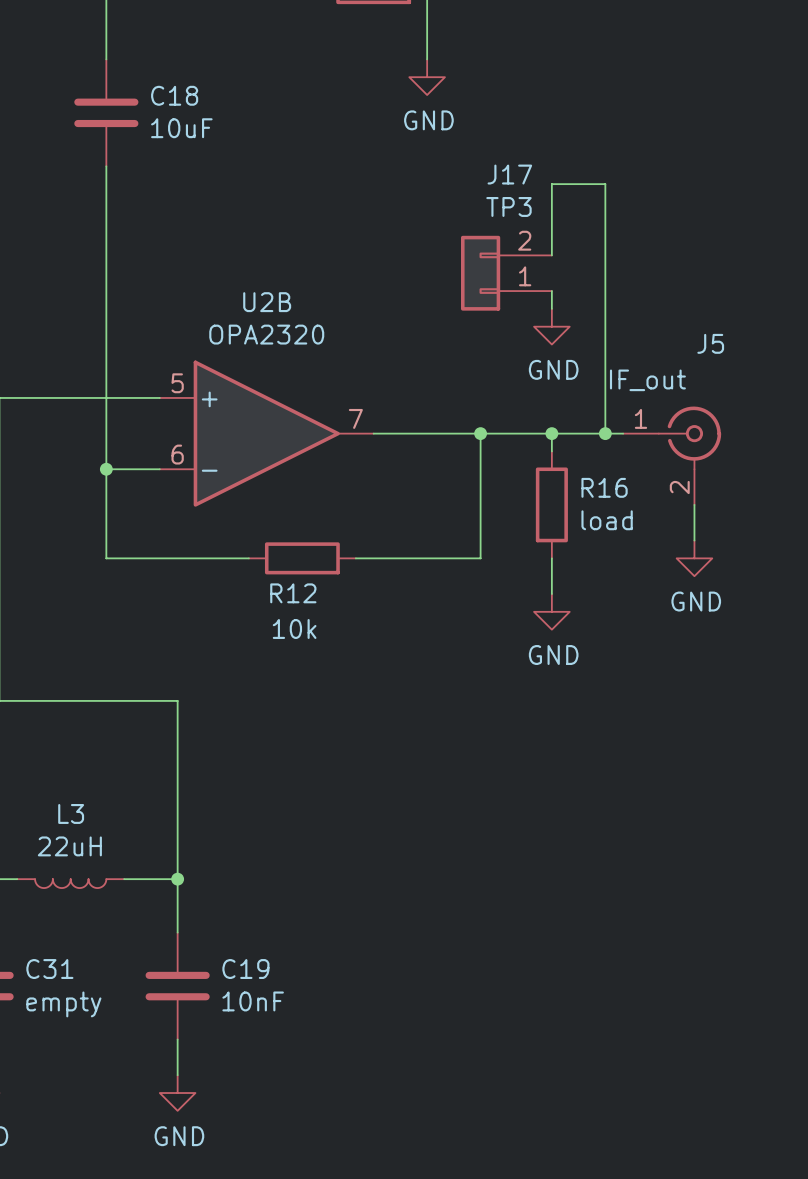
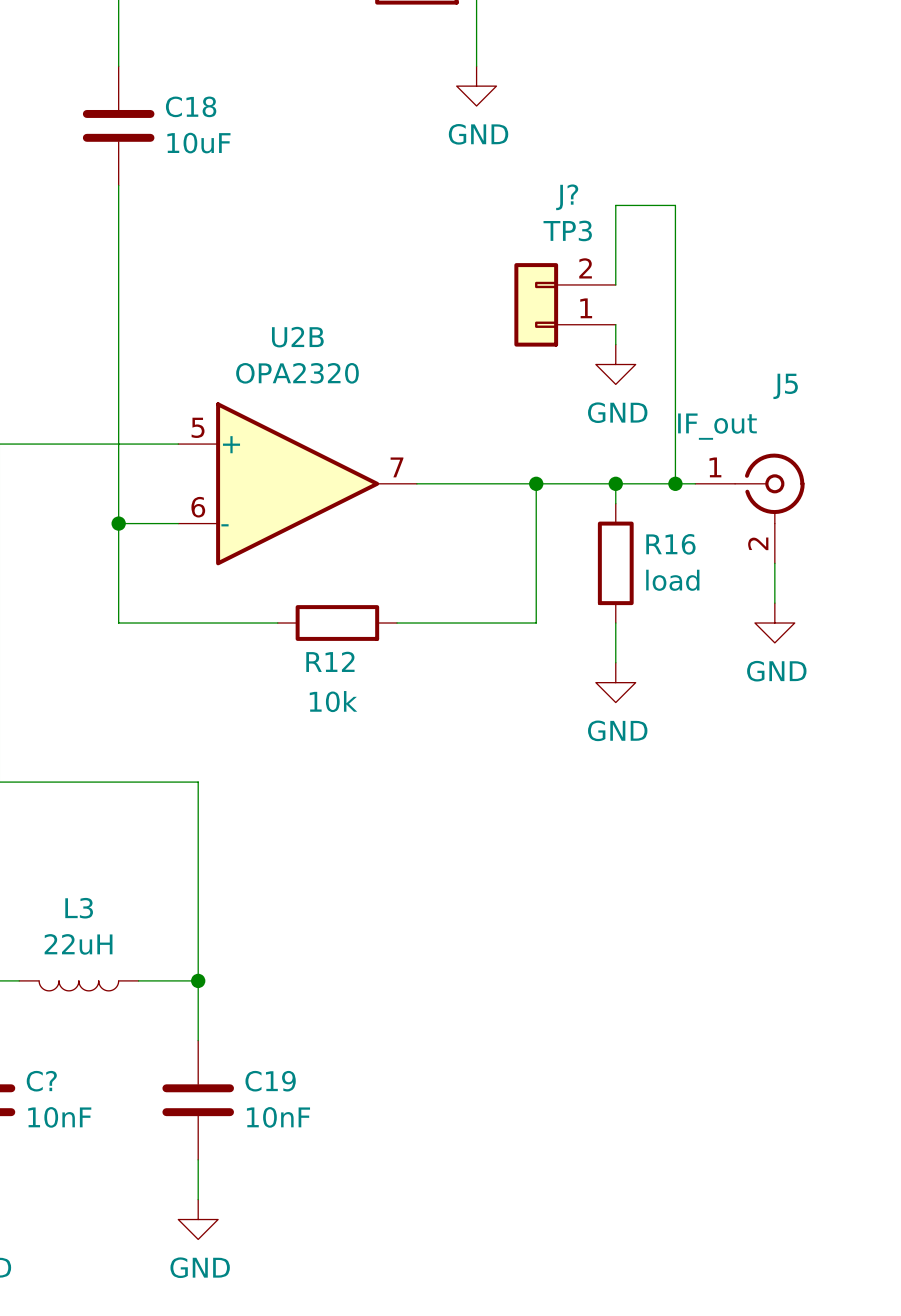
J17 name: J17 (509, 174) -> J? (567, 197)
C31 name: C31 (49, 969) -> C? (41, 1081)
C31 value: empty (63, 1004) -> 10nF (59, 1117)

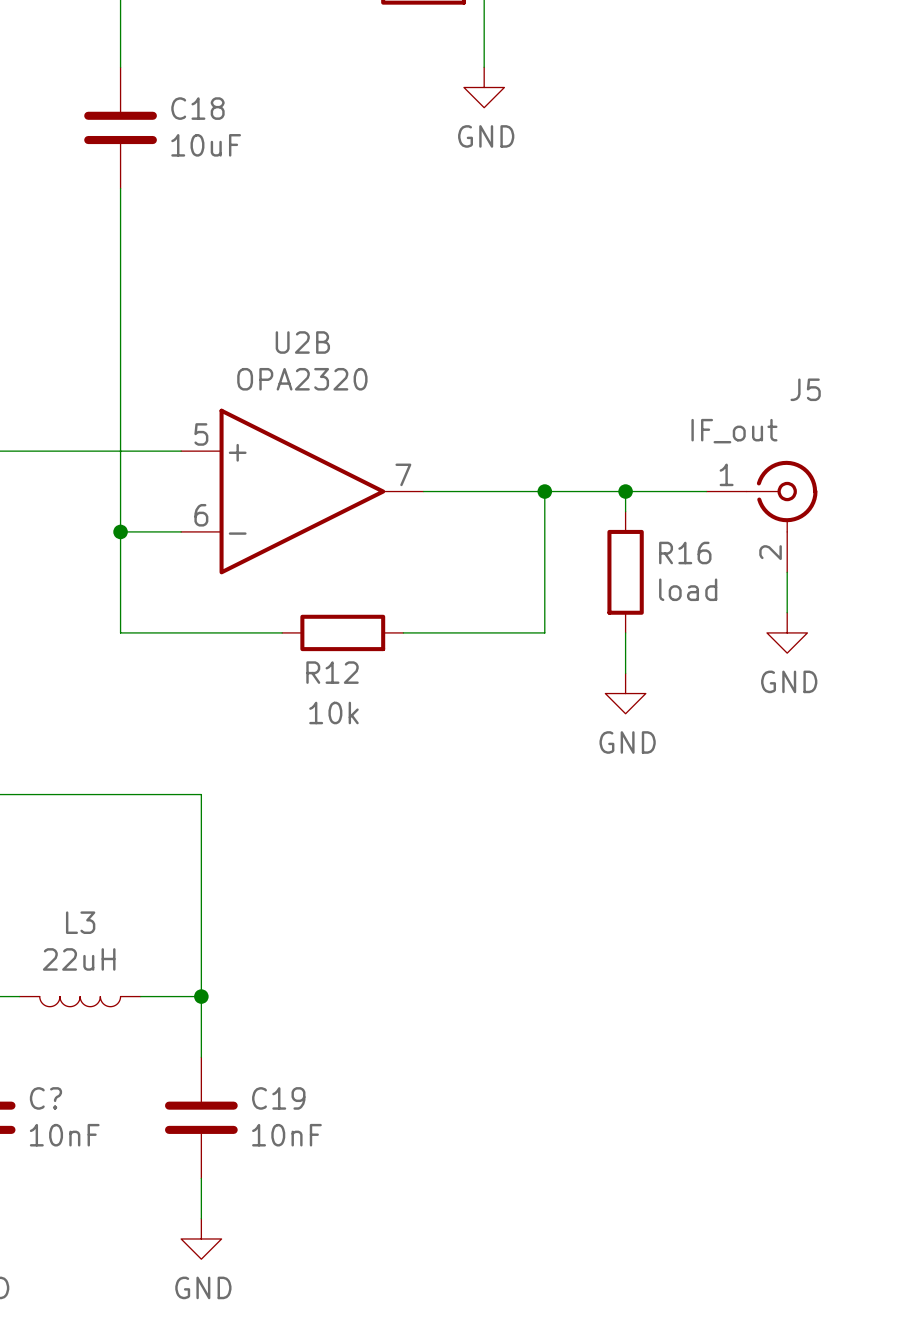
wire: (615, 284) (615, 205) (675, 205) (675, 483) -> none
J?: TP3 (565, 304) -> none
wire: (615, 324) (615, 344) -> none
power symbol: GND (615, 364) -> none
junction: (675, 483) -> none

